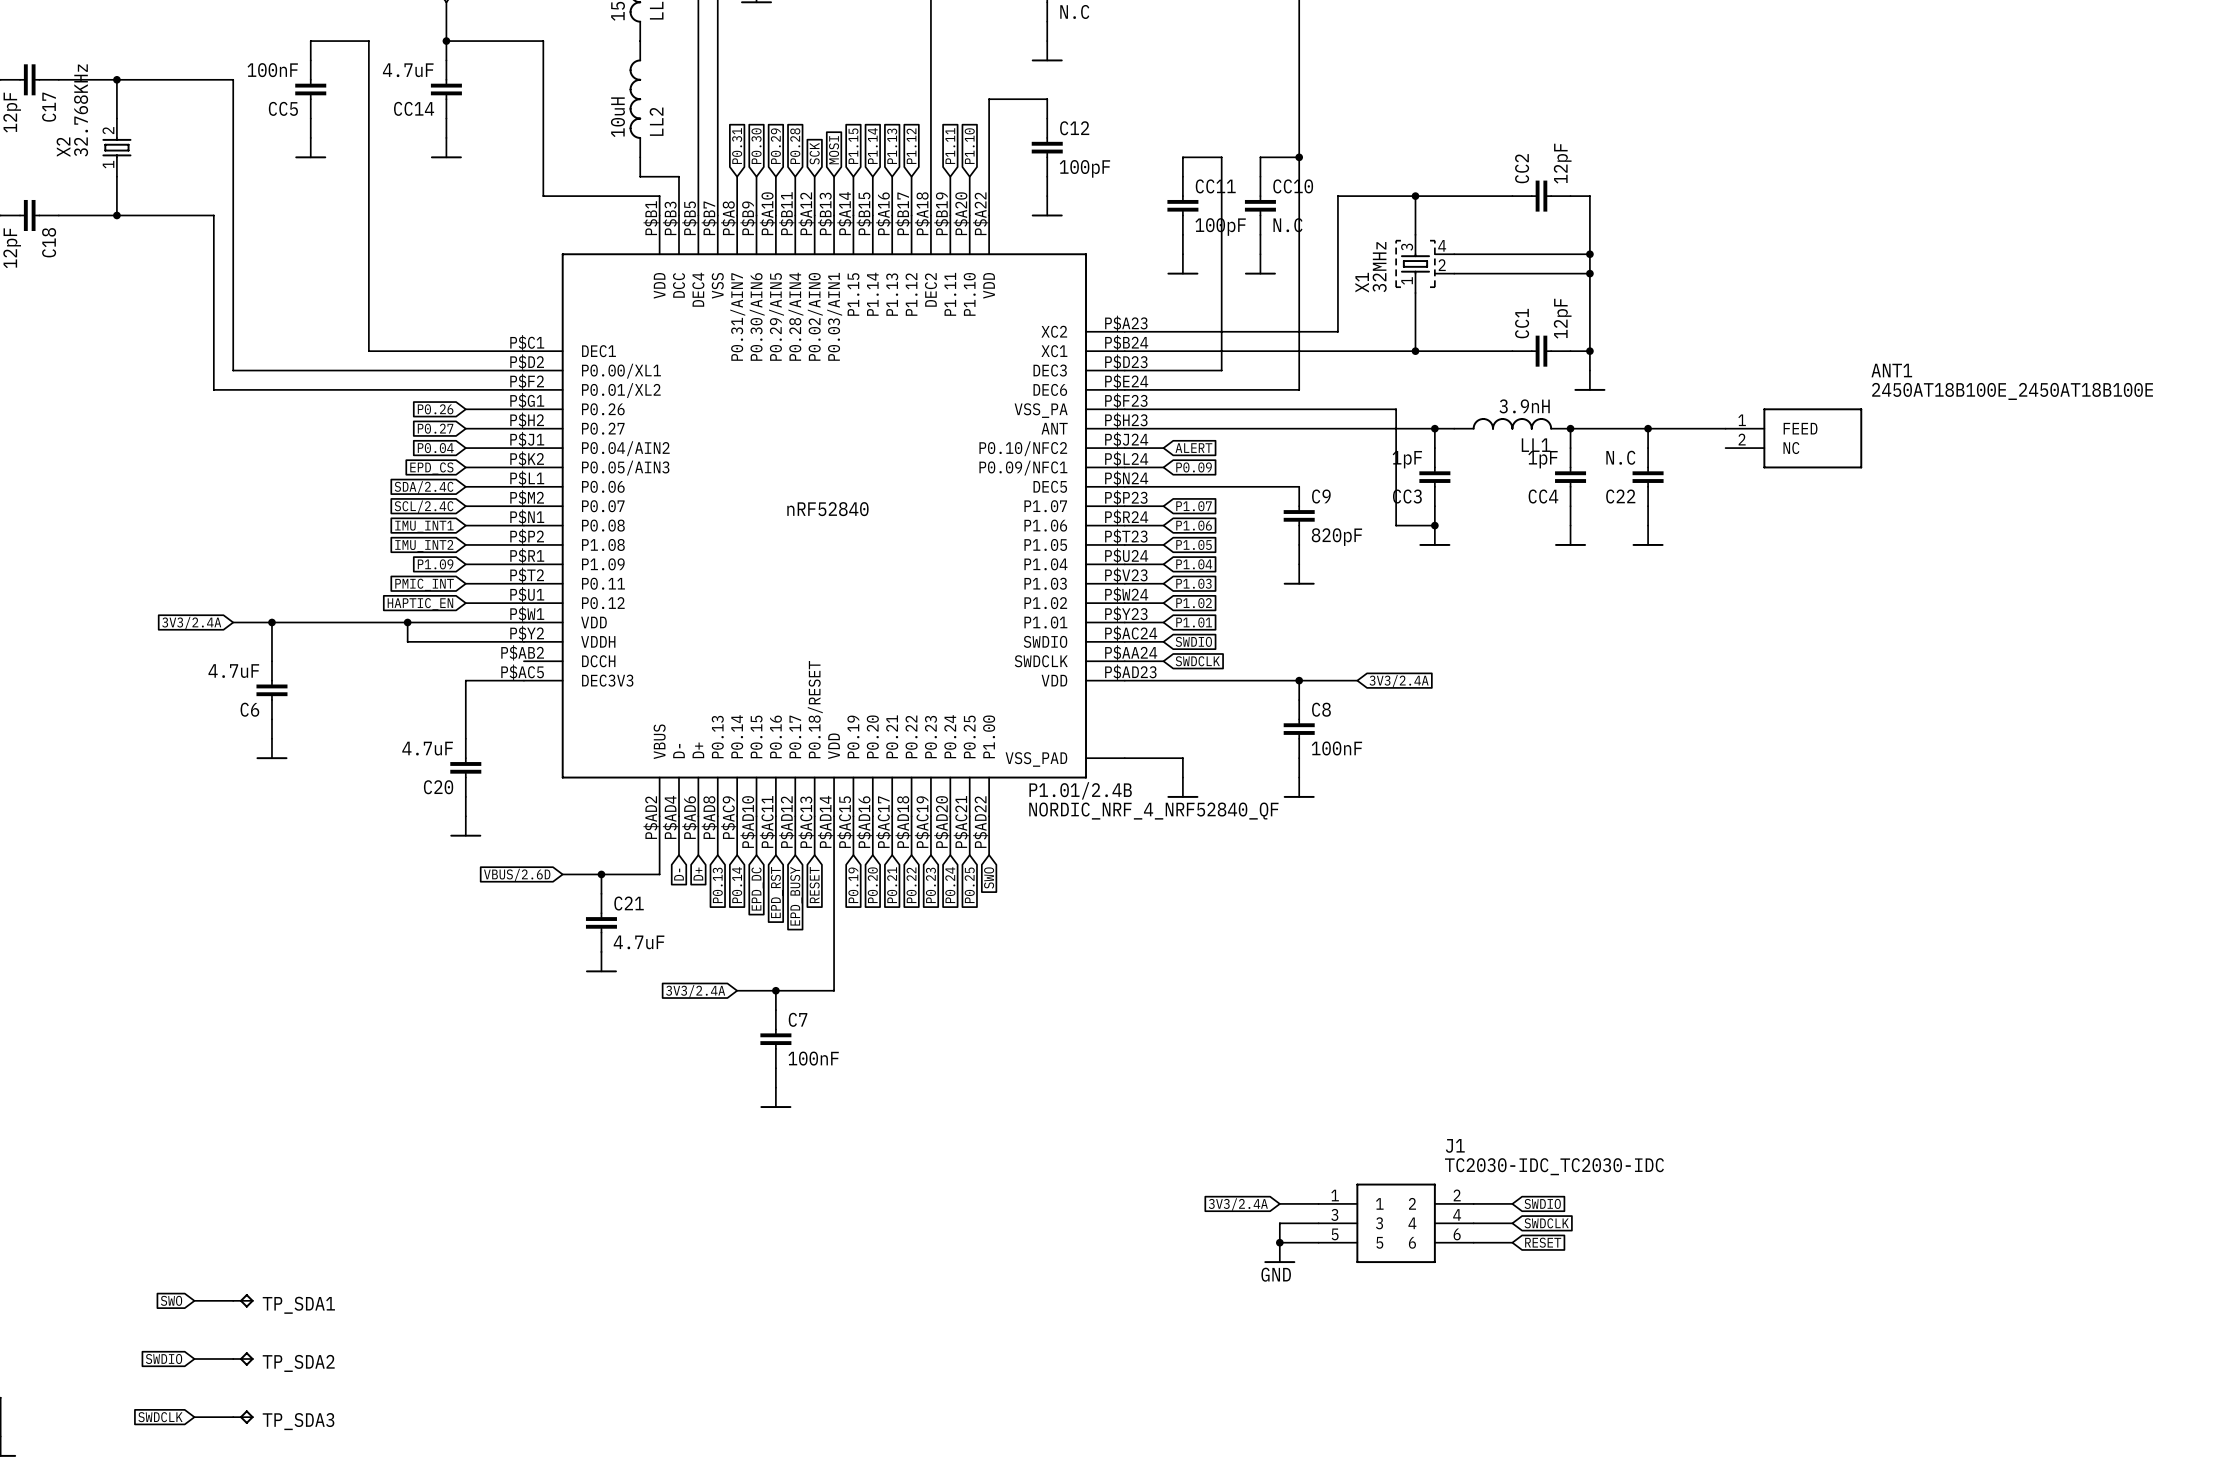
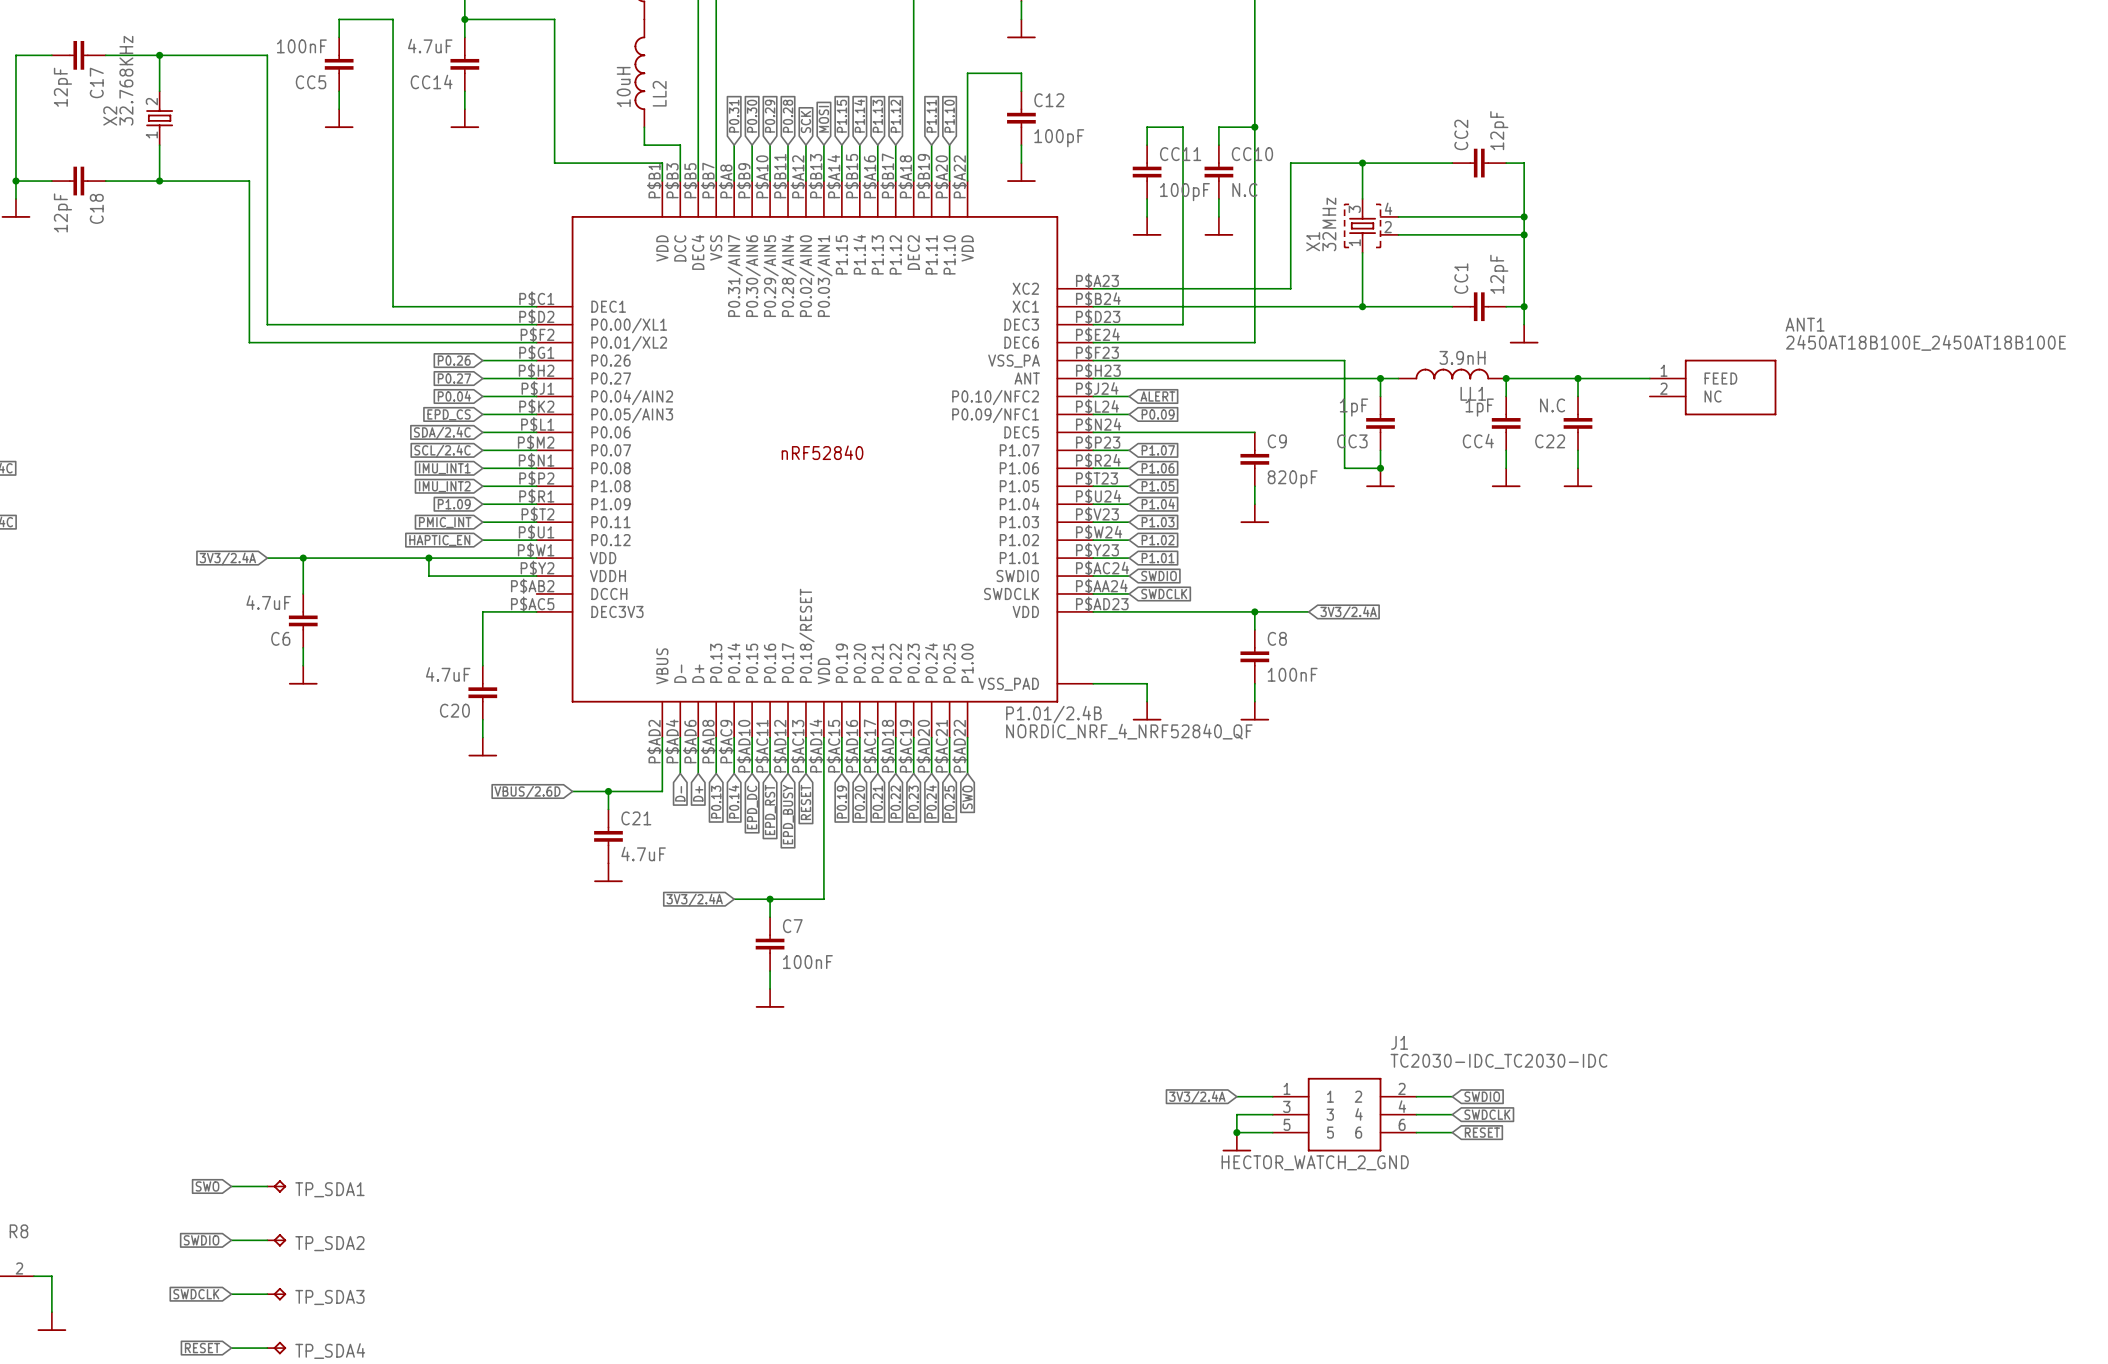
power symbol: GND (1279, 1252) -> HECTOR_WATCH_2_GND (1236, 1142)

